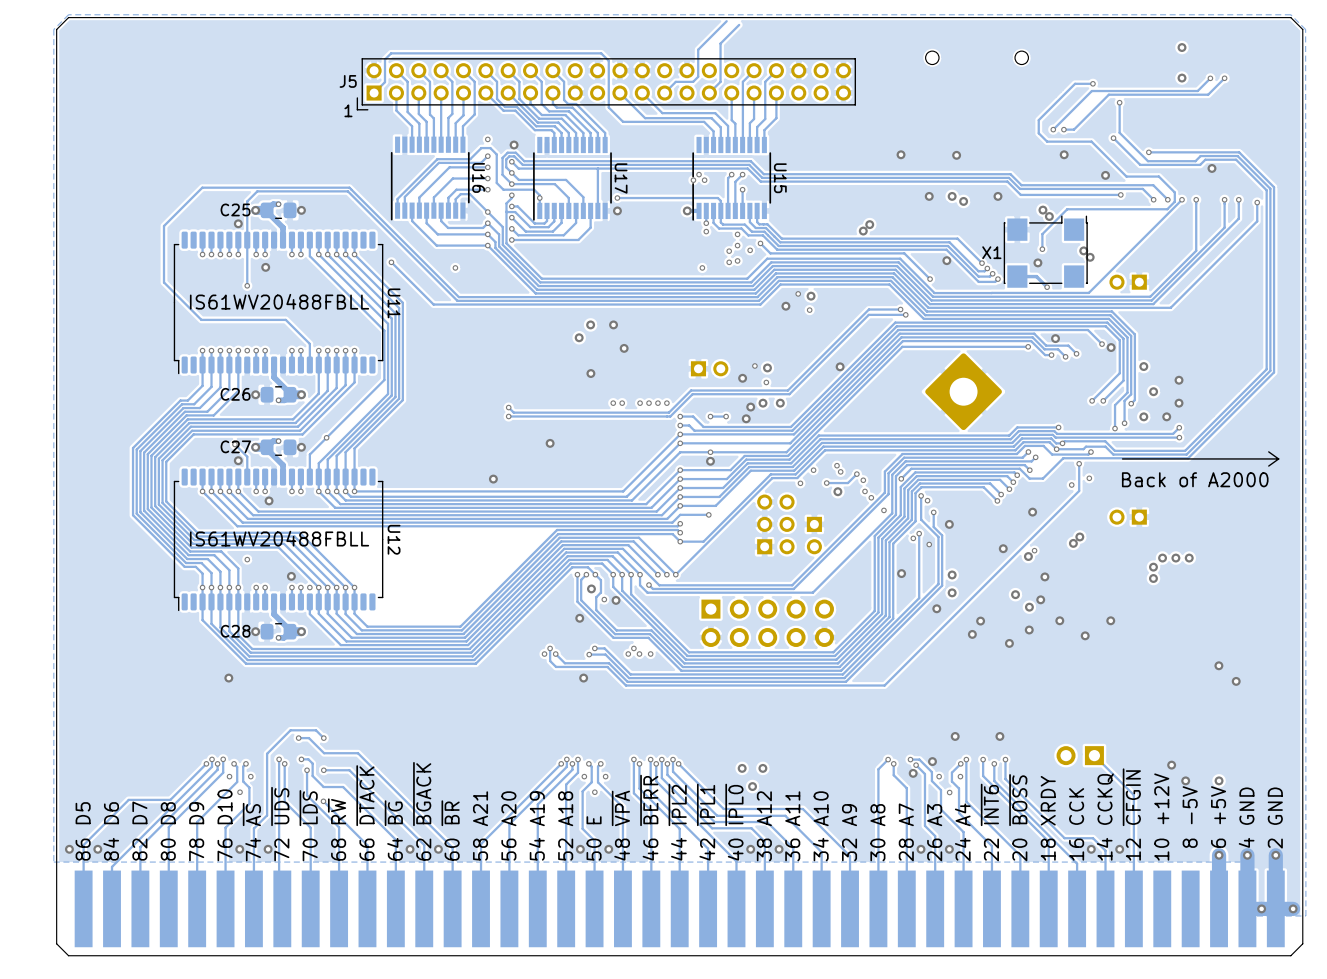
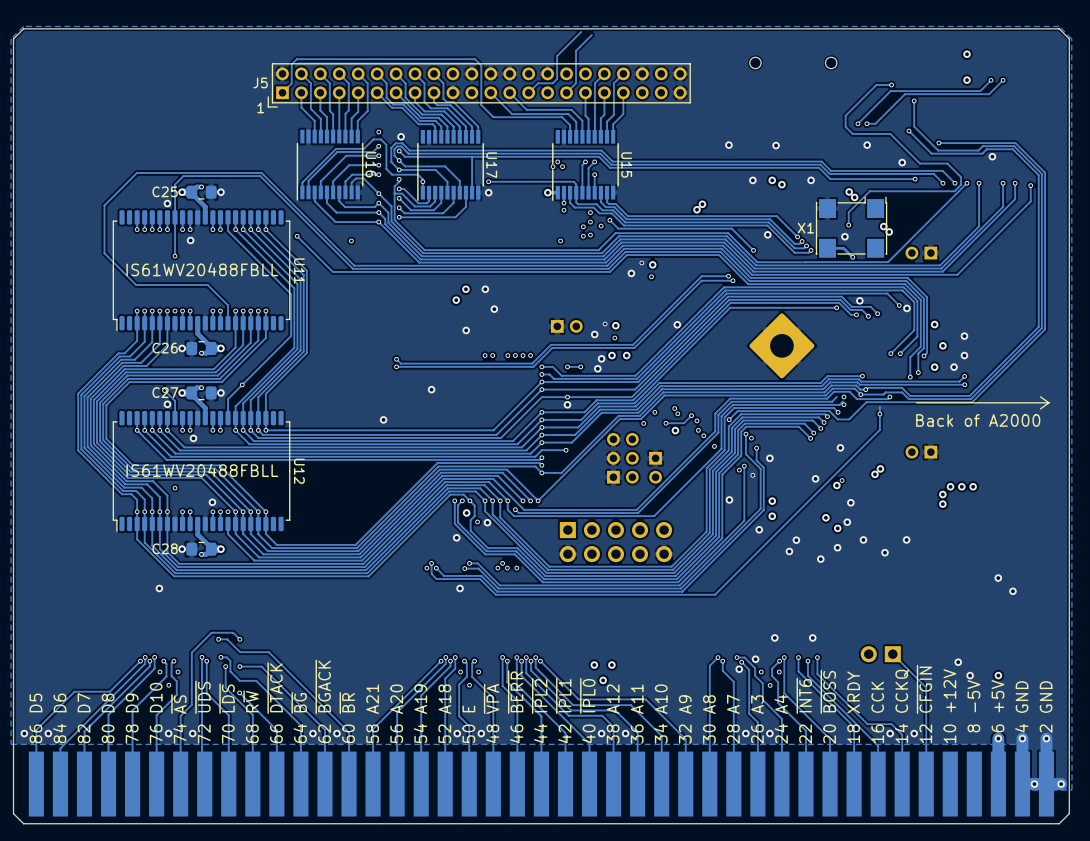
via: (1028, 451) -> none
via: none -> (843, 396)
via: (1035, 457) -> none
via: none -> (843, 404)
via: (1079, 463) -> none
via: none -> (879, 414)
via: (1089, 478) -> none
via: (1071, 485) -> none

